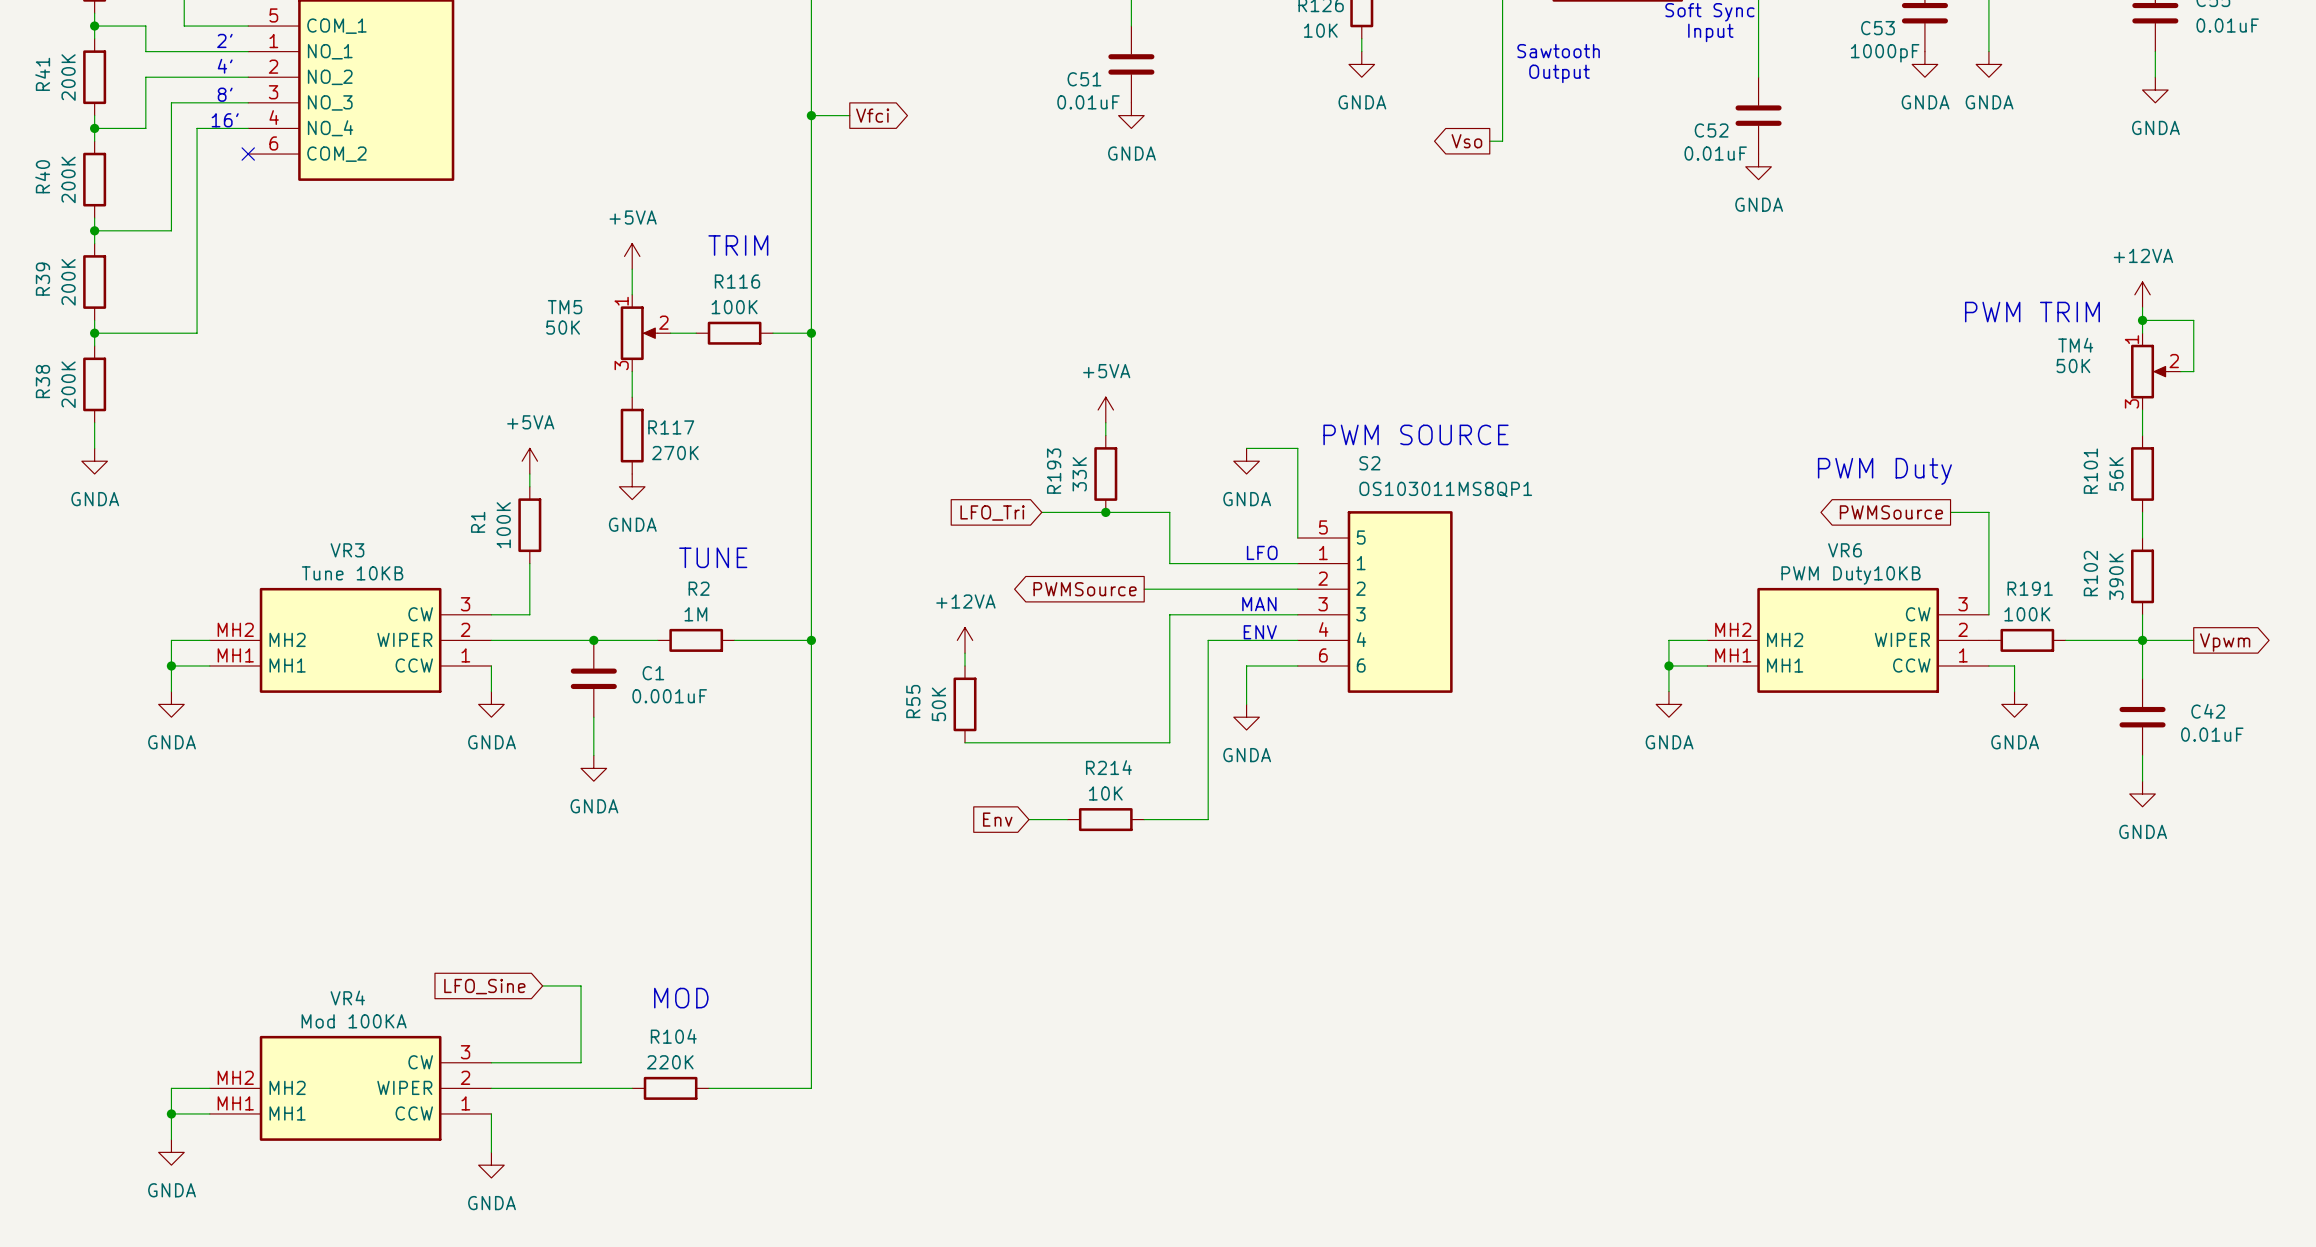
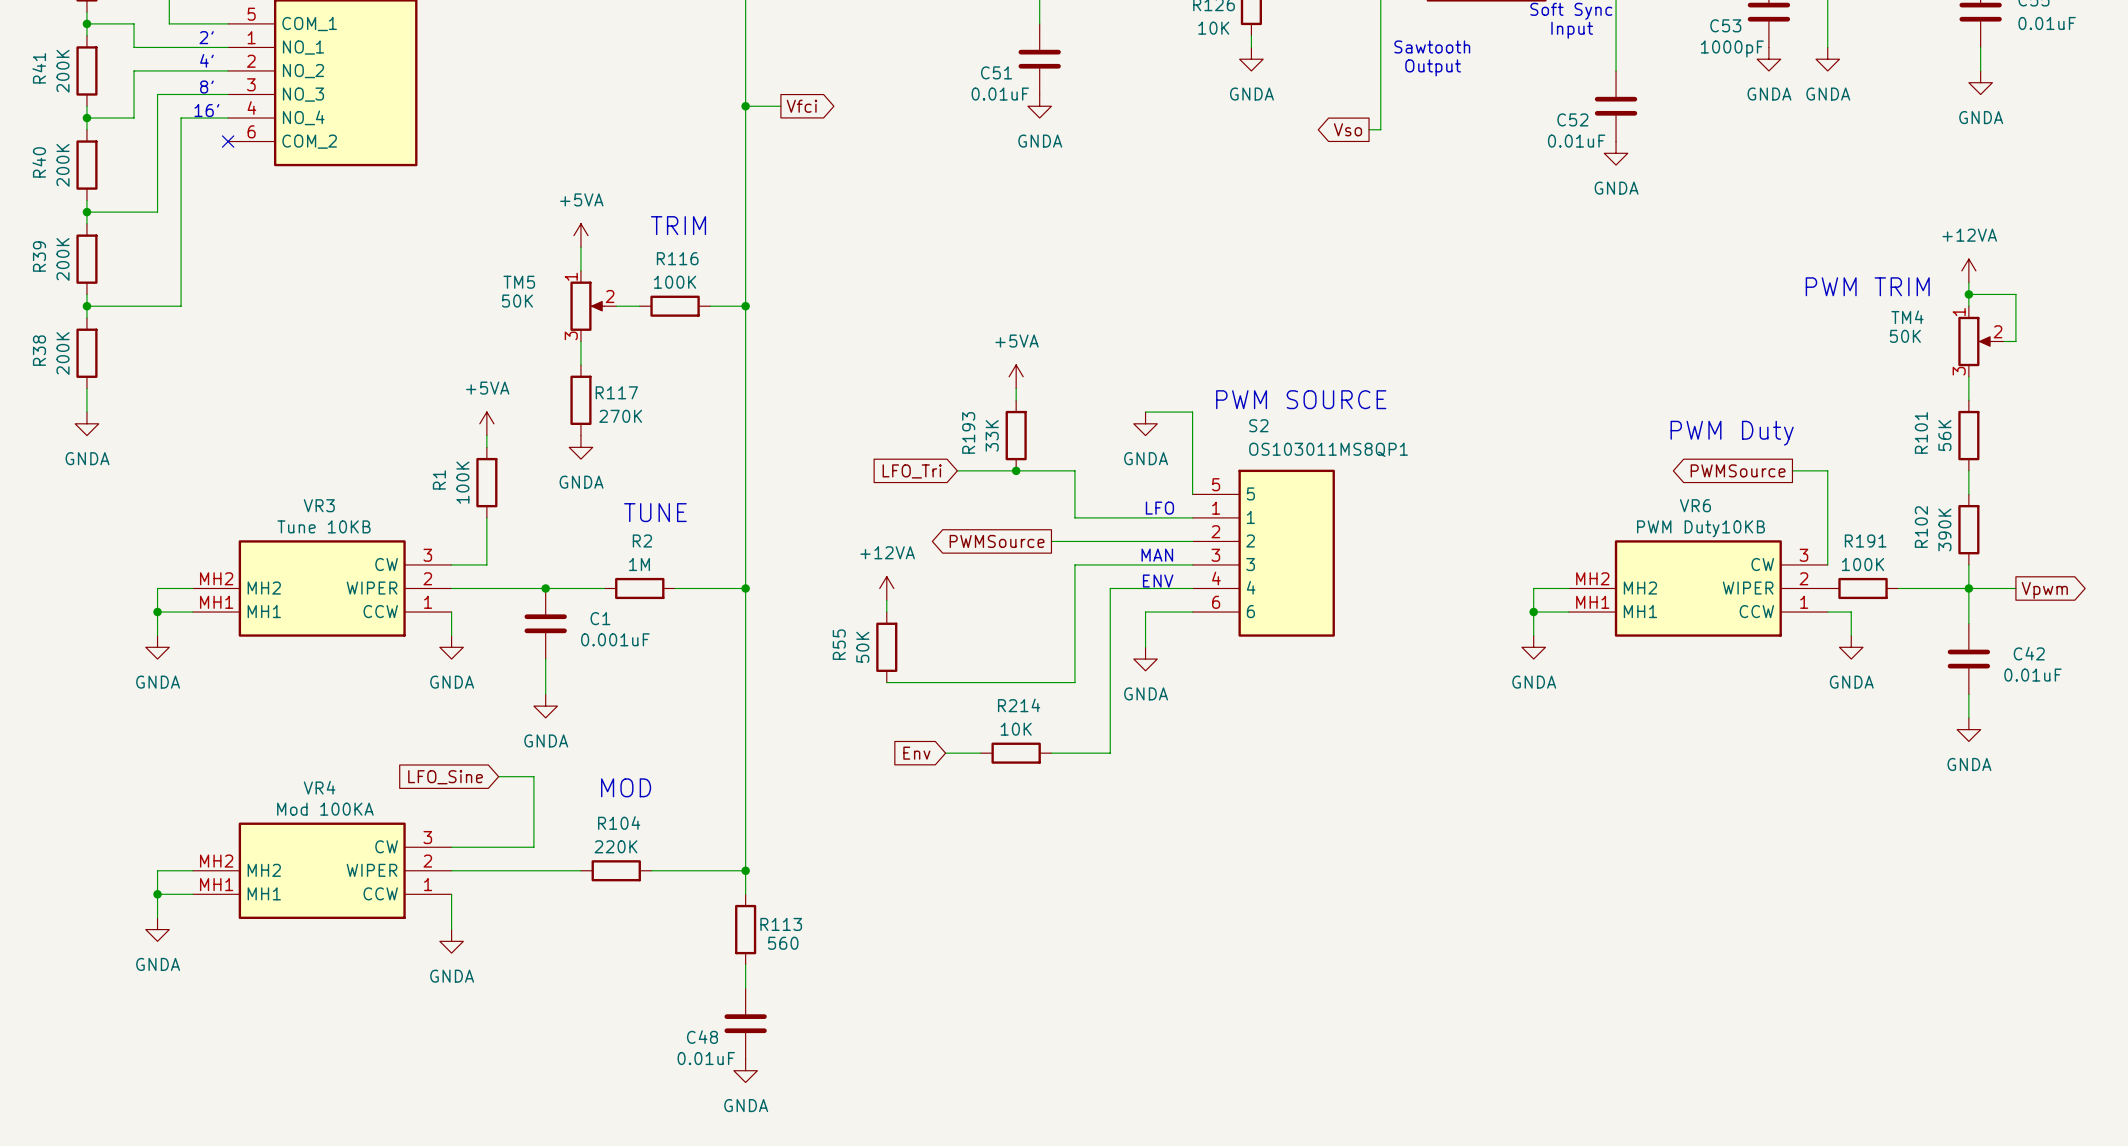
wire: none -> (651, 870) (745, 870)
junction: none -> (745, 870)
junction: none -> (157, 894)
wire: (811, 973) (811, 1049) -> none
wire: (542, 985) (581, 985) (581, 1062) (491, 1062) -> (498, 776) (533, 776) (533, 847) (451, 847)
global label position: LFO_Sine (484, 986) -> LFO_Sine (445, 777)
text position: MOD (681, 998) -> MOD (626, 787)
R113: none -> 560 (745, 929)
wire: (811, 1075) (811, 1088) (709, 1088) -> none
wire: (209, 1088) (171, 1088) (171, 1139) -> (192, 870) (157, 870) (157, 917)
VR4 position: (350, 1088) -> (322, 870)
wire: (491, 1088) (632, 1088) -> (451, 870) (580, 870)
R104 position: (670, 1088) -> (616, 870)
wire: (171, 1113) (209, 1113) -> (157, 894) (192, 894)
junction: (171, 1113) -> none
wire: (491, 1113) (491, 1152) -> (451, 894) (451, 929)
C48: none -> 0.01uF (745, 1023)
power symbol position: GNDA (171, 1152) -> GNDA (157, 929)
power symbol position: GNDA (491, 1165) -> GNDA (451, 941)
power symbol: none -> GNDA (745, 1070)

